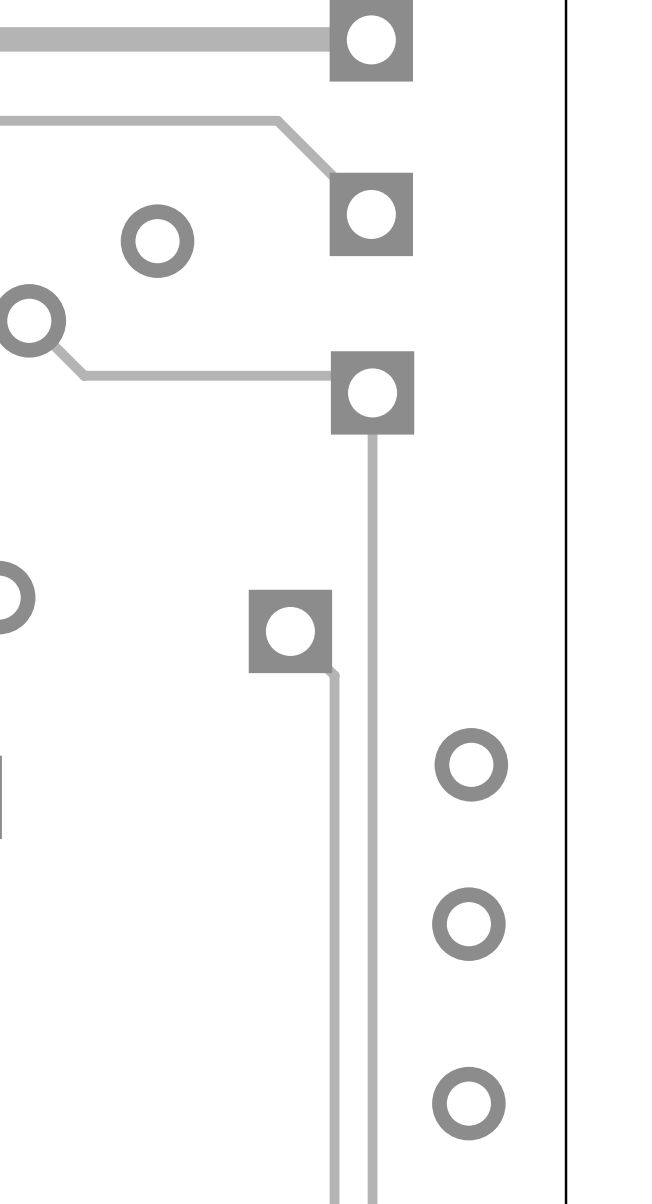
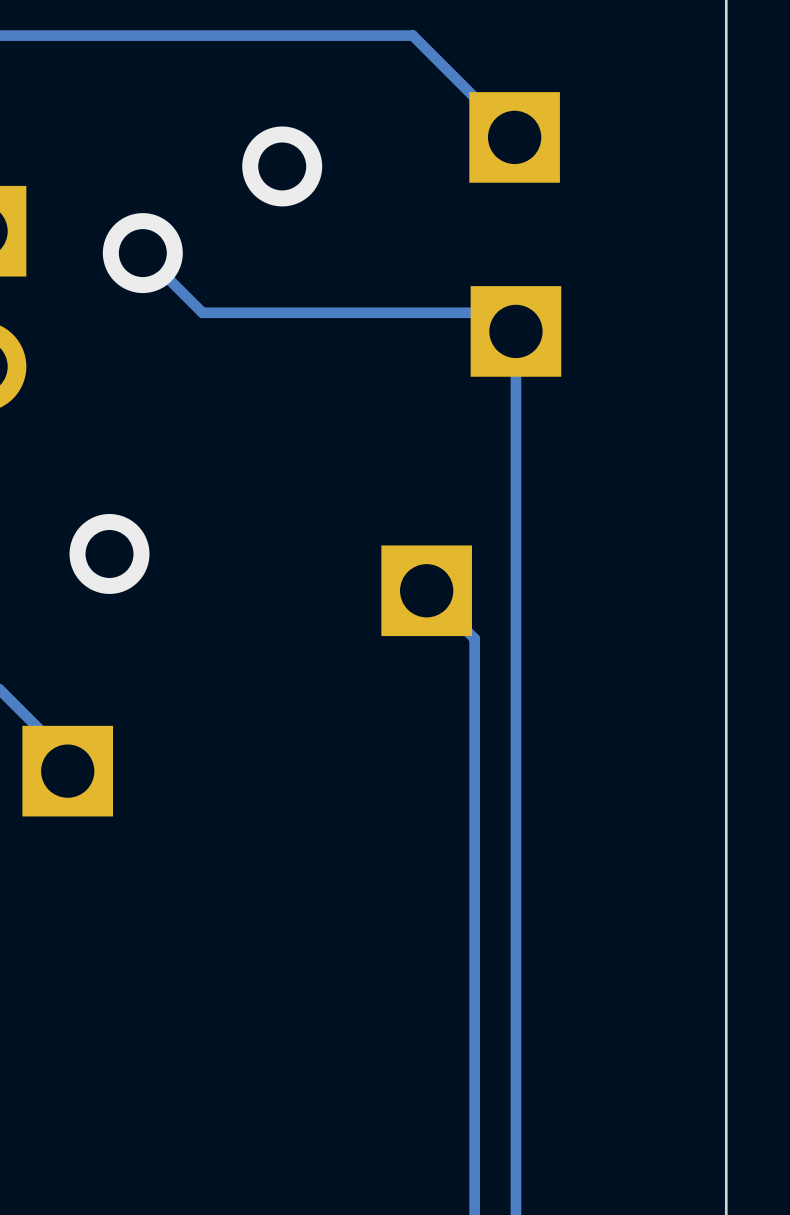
via: (471, 764) -> none
via: (468, 924) -> none
via: (468, 1103) -> none

